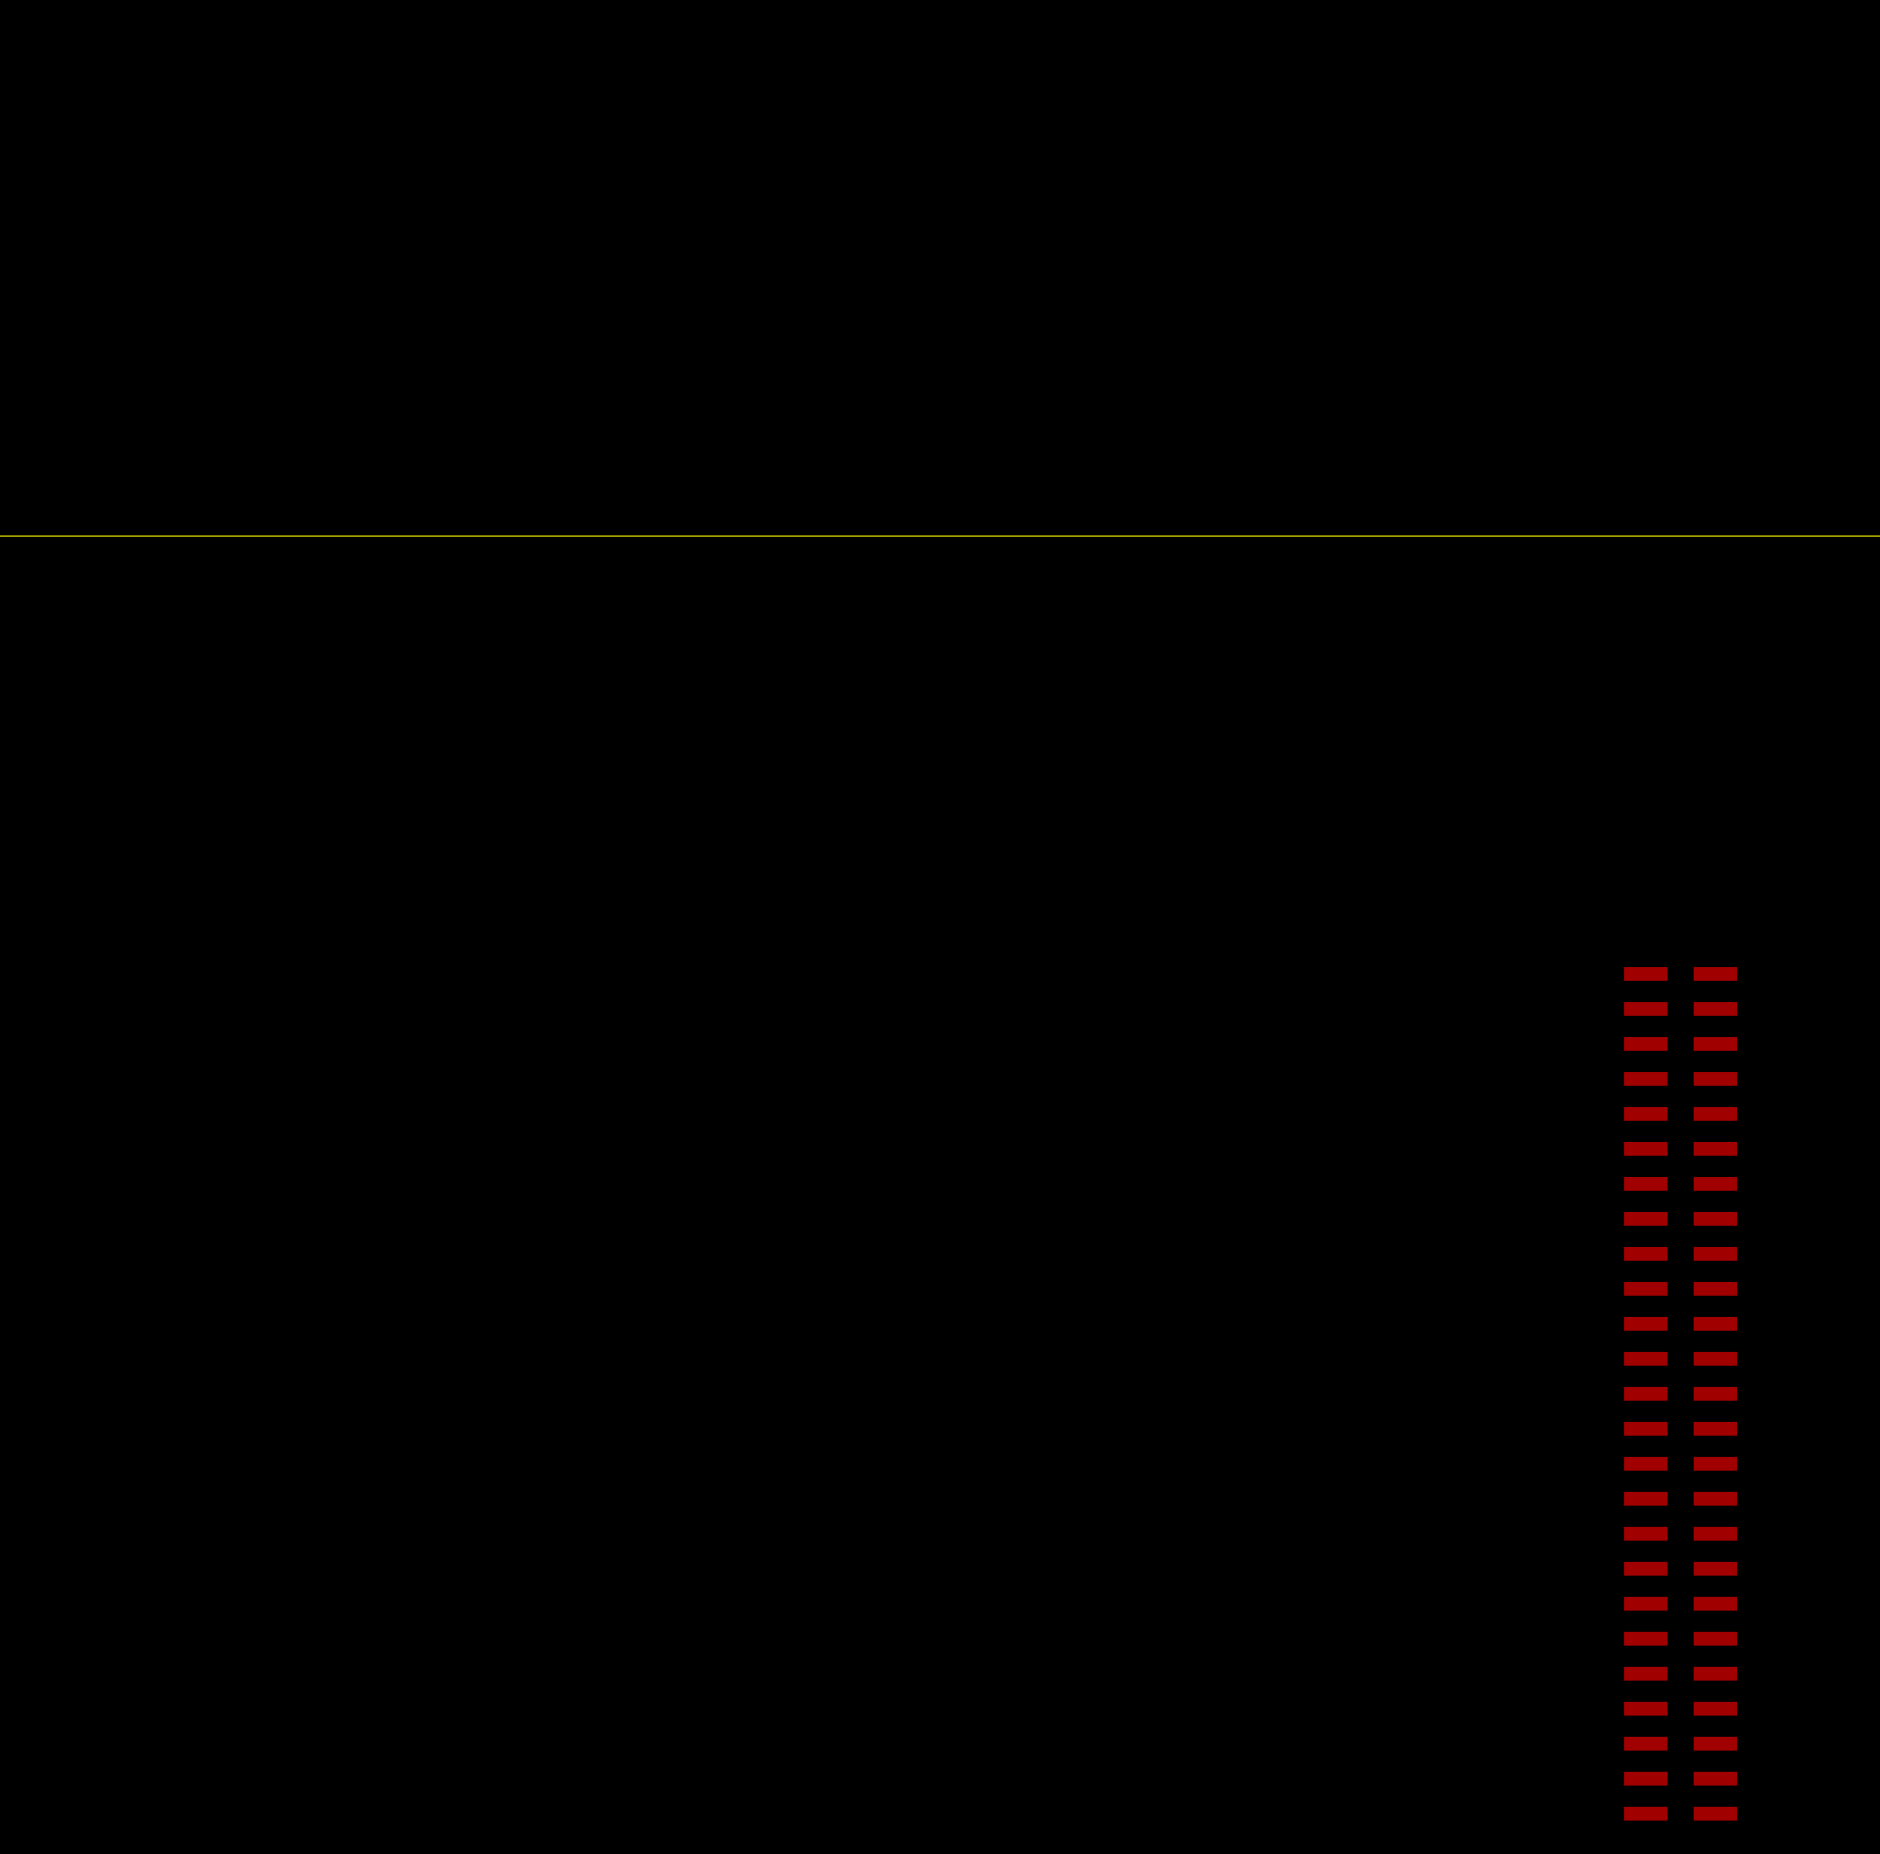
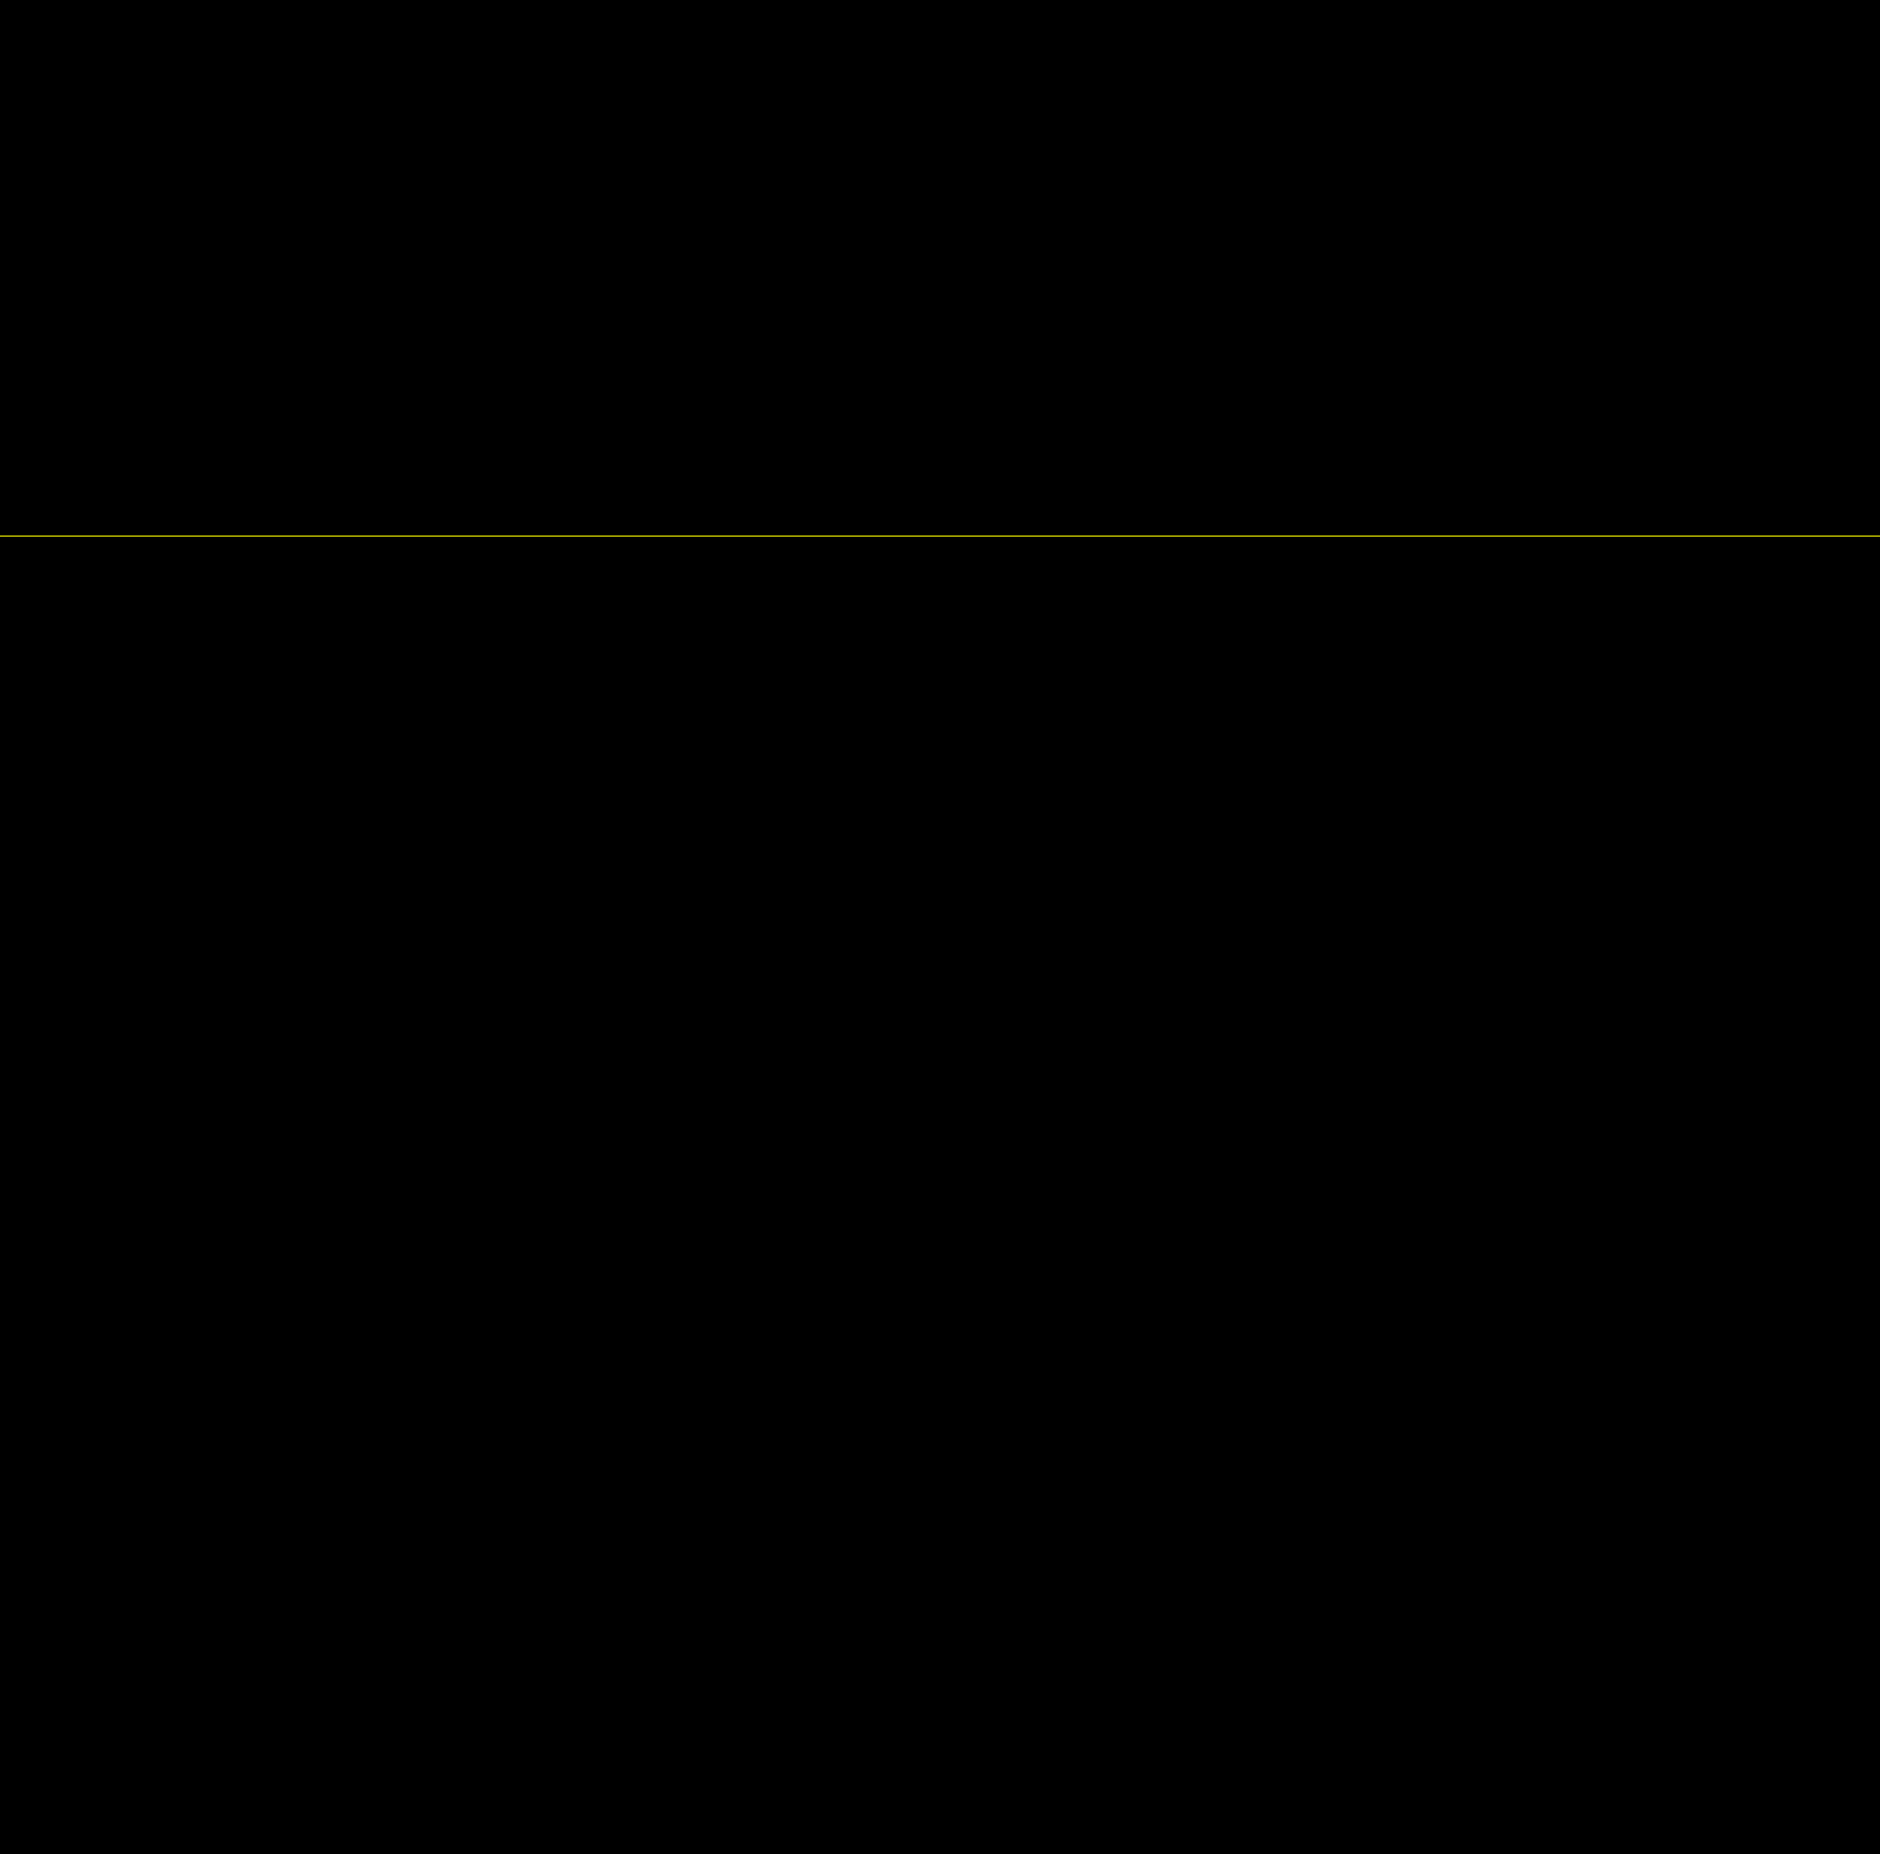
part: (1680, 1393) -> none

